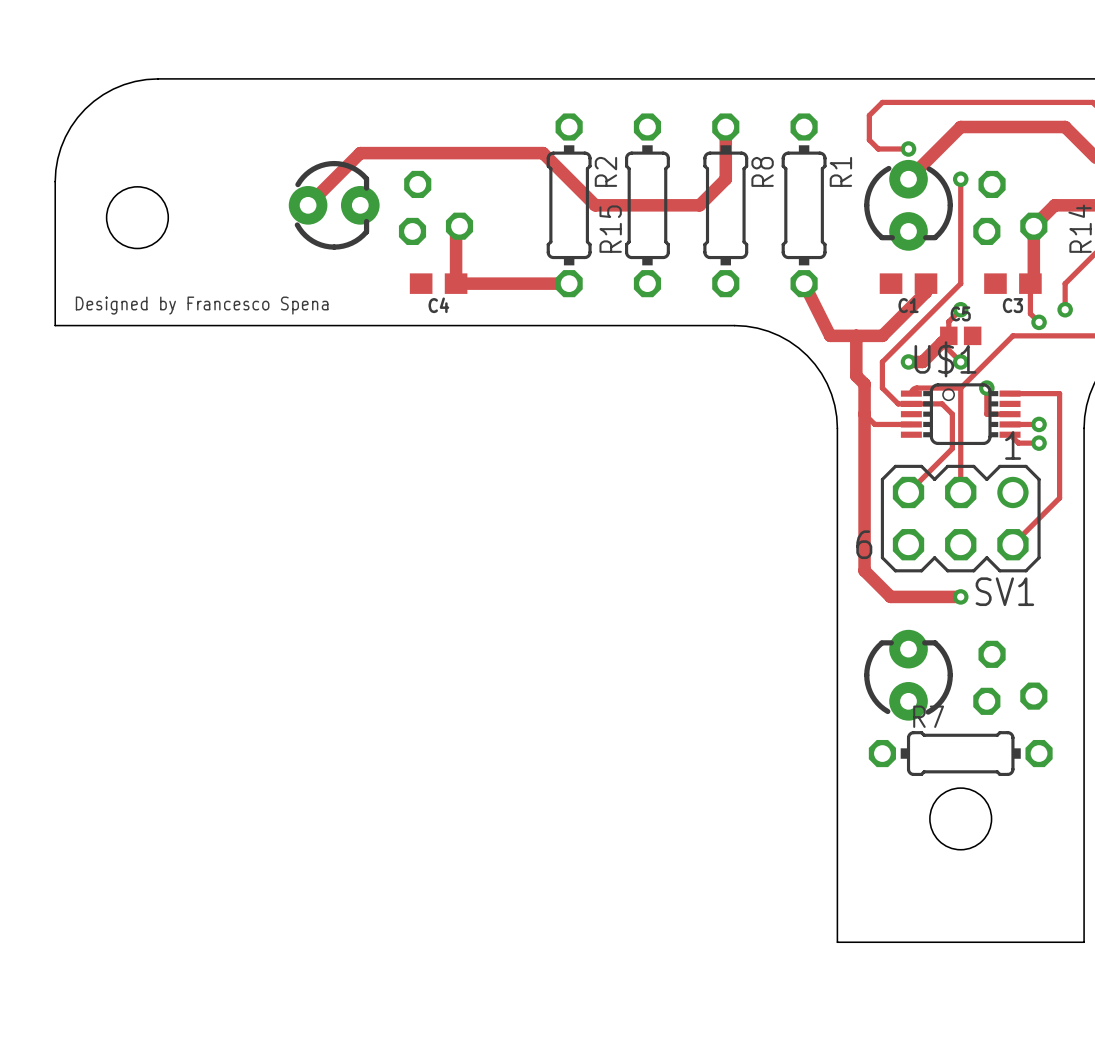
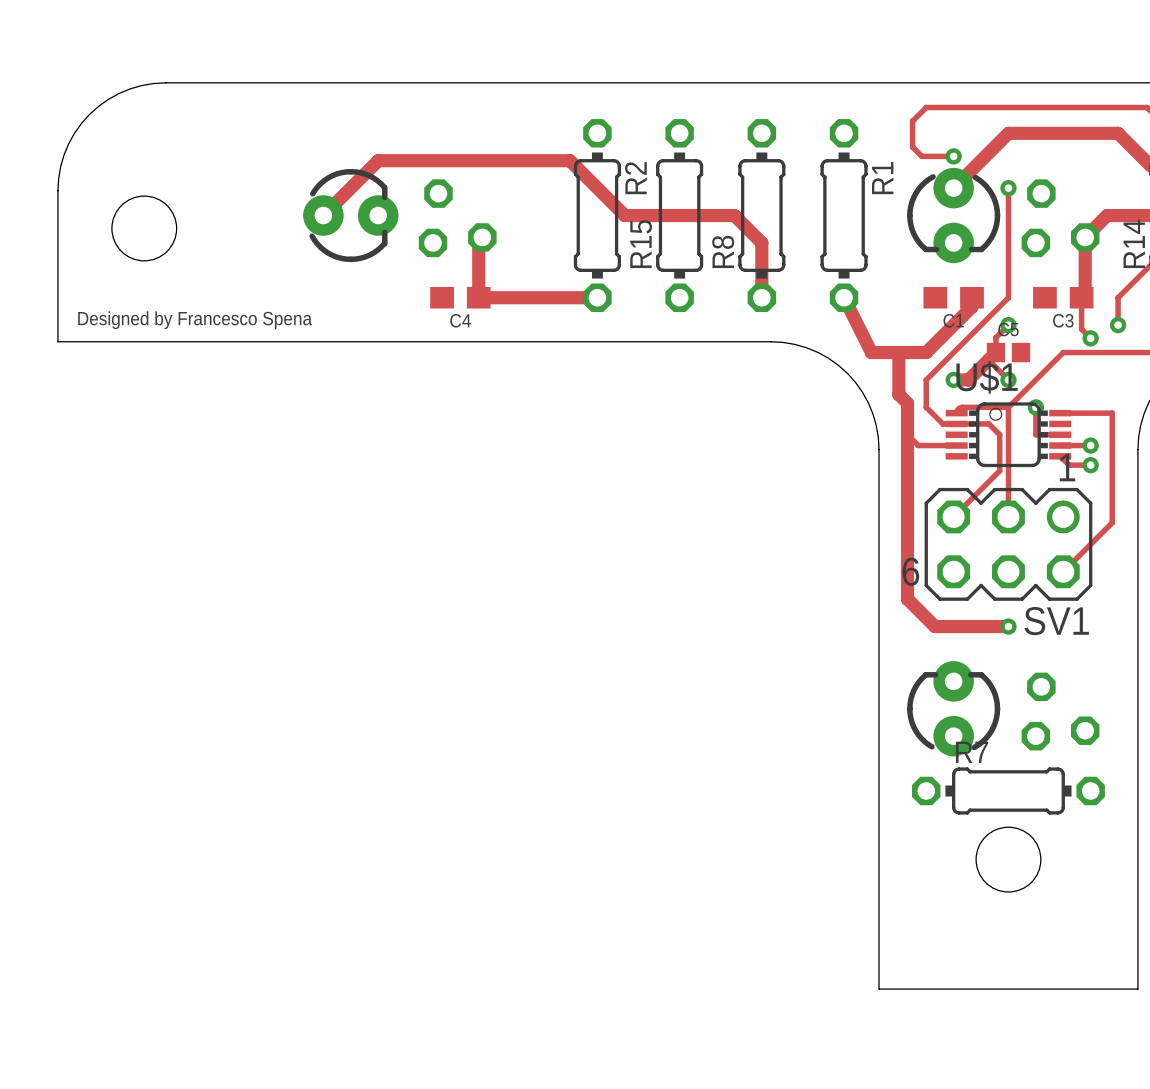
track: (725, 127) (725, 179) (699, 205) -> (761, 297) (761, 242) (734, 215)
R8 name position: R8 (762, 171) -> R8 (723, 251)

